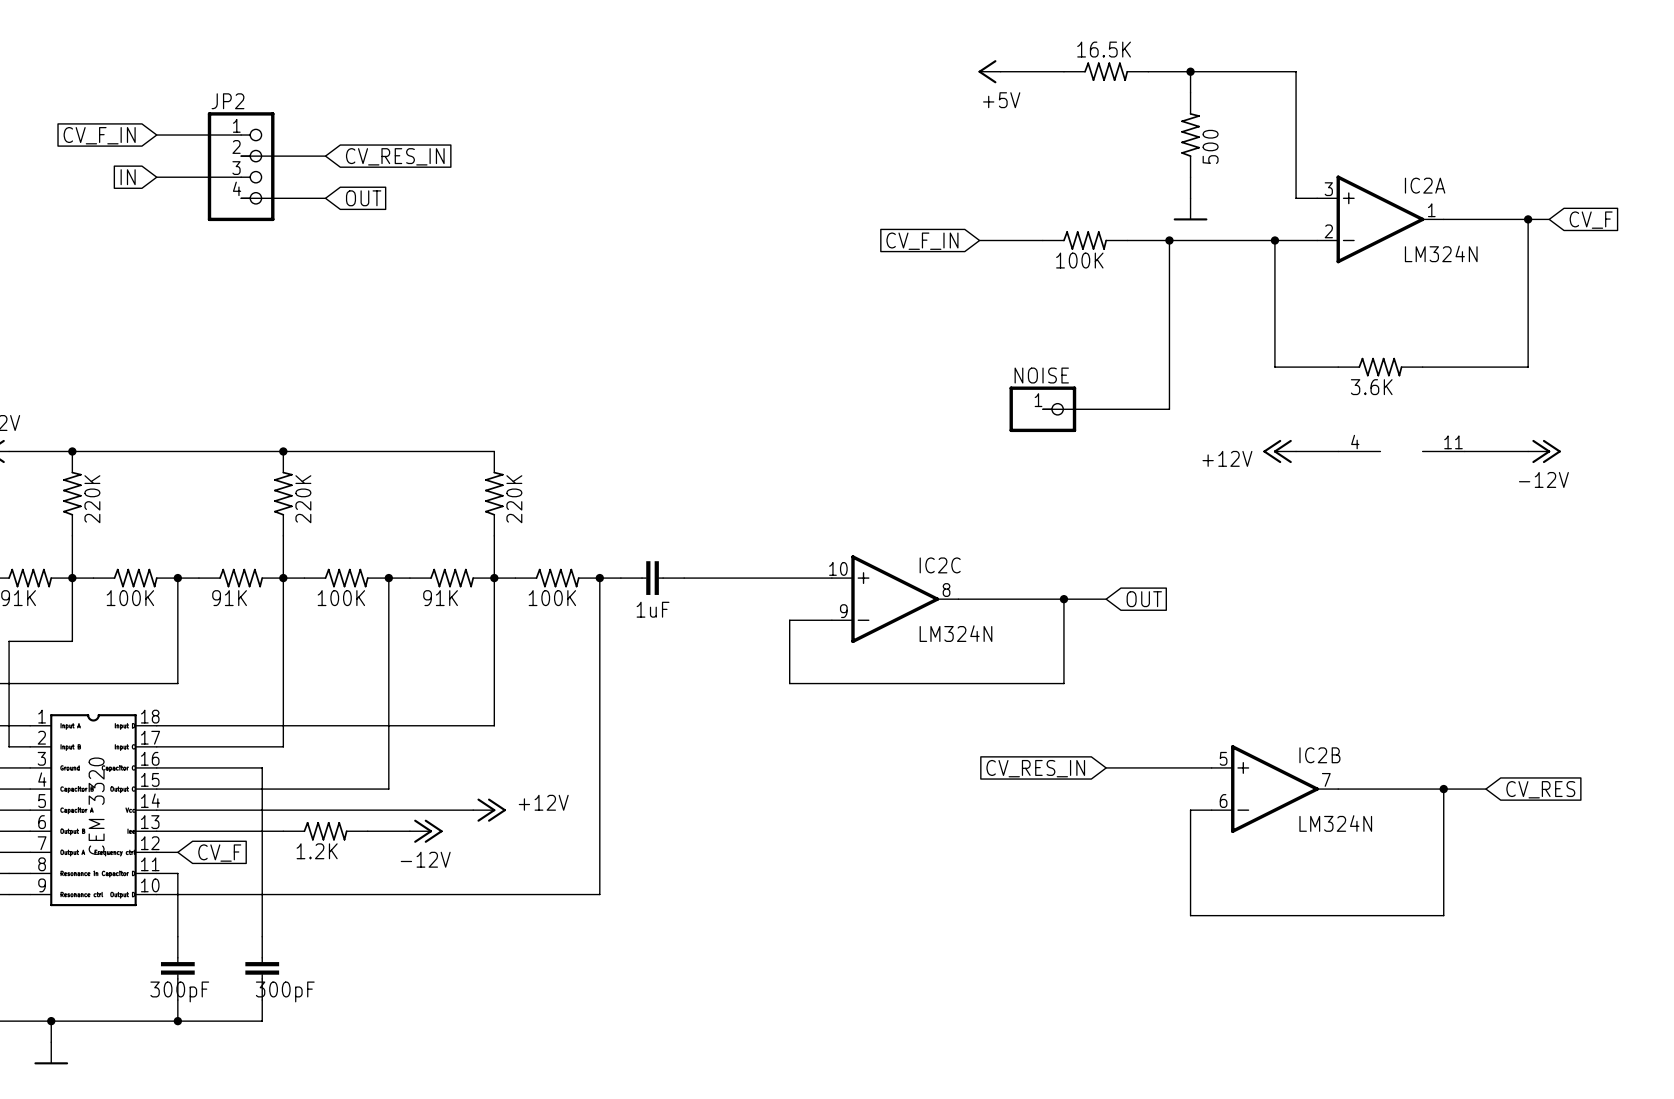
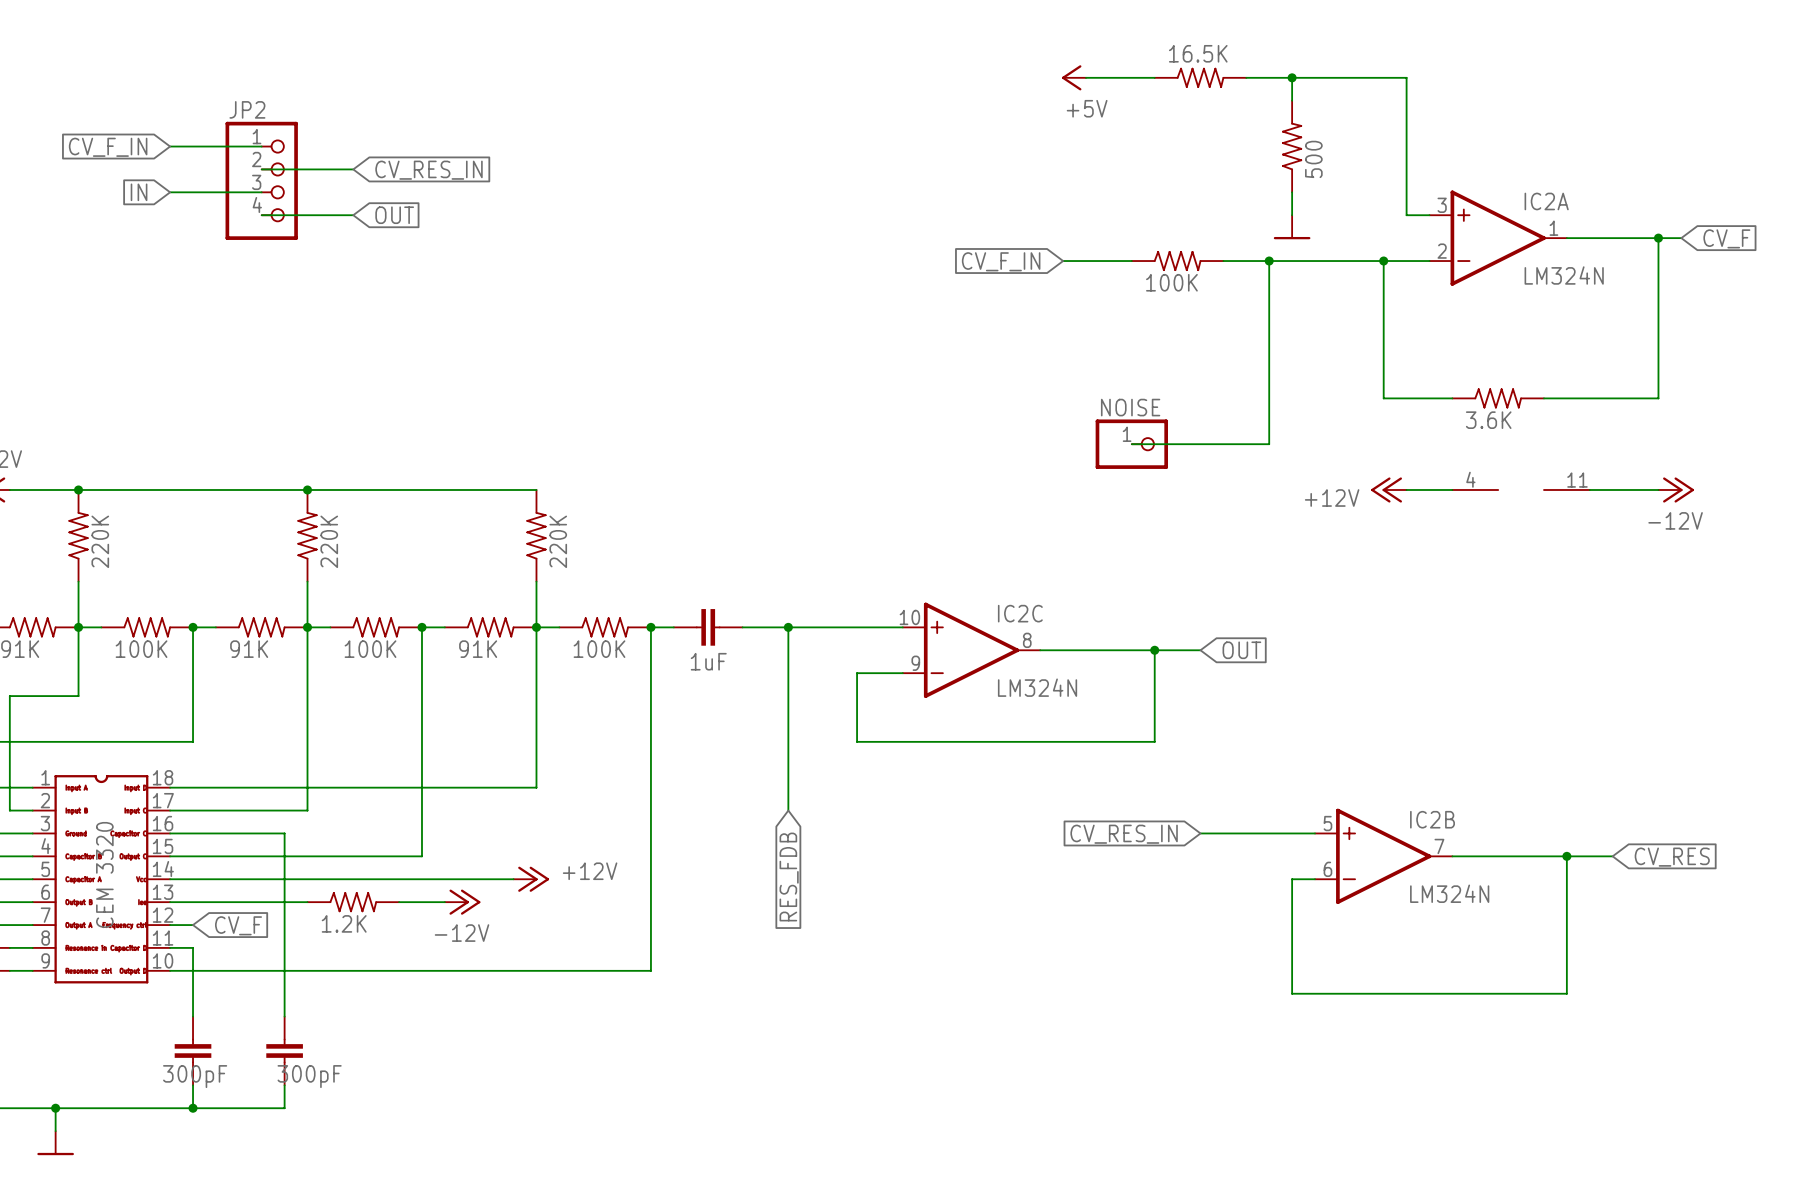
wire: none -> (788, 627) (788, 810)
junction: none -> (788, 627)
global label: none -> RES_FDB (789, 877)

